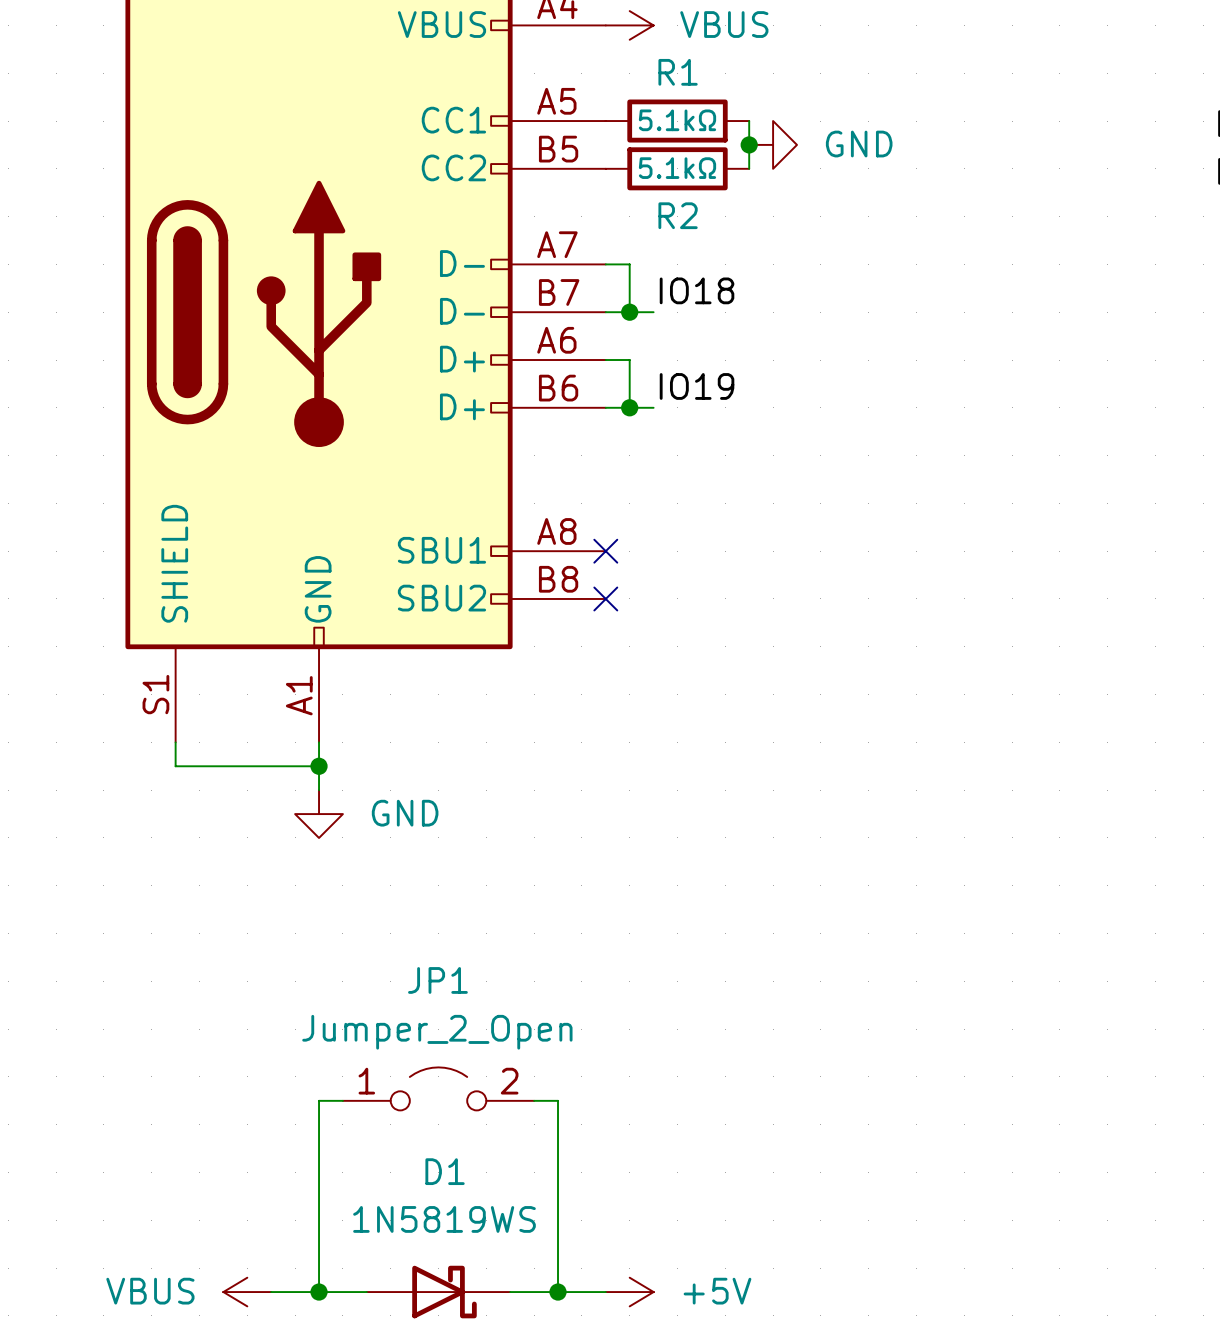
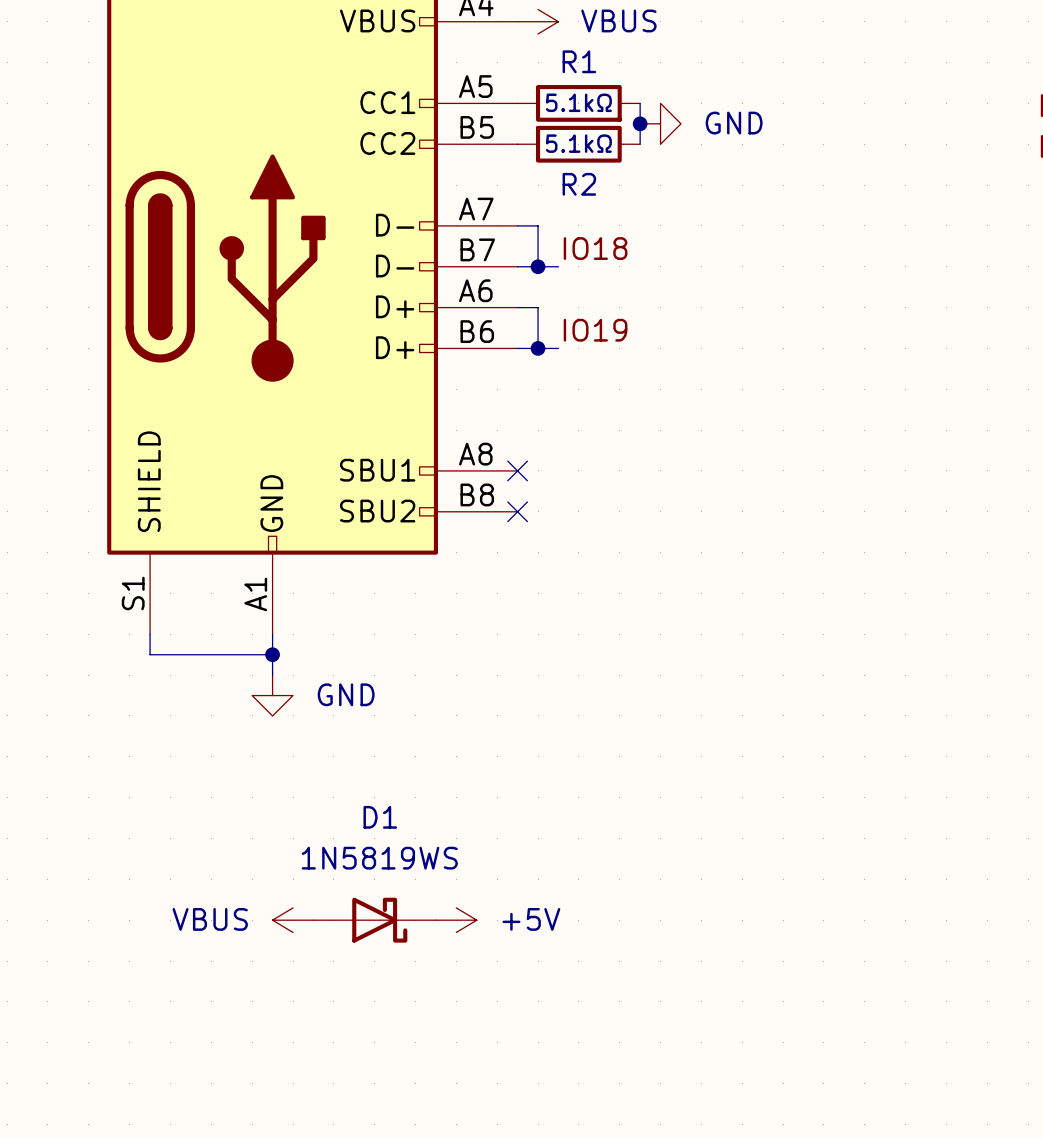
JP1: Jumper_2_Open (438, 1088) -> none
wire: (342, 1100) (319, 1100) (319, 1292) -> none
wire: (534, 1100) (558, 1100) (558, 1292) -> none
power symbol position: VBUS (247, 1292) -> VBUS (293, 920)
wire: (271, 1292) (366, 1292) -> none
junction: (319, 1292) -> none
D1 position: (438, 1292) -> (374, 920)
wire: (510, 1292) (605, 1292) -> none
junction: (558, 1292) -> none
power symbol position: +5V (629, 1292) -> +5V (456, 920)

